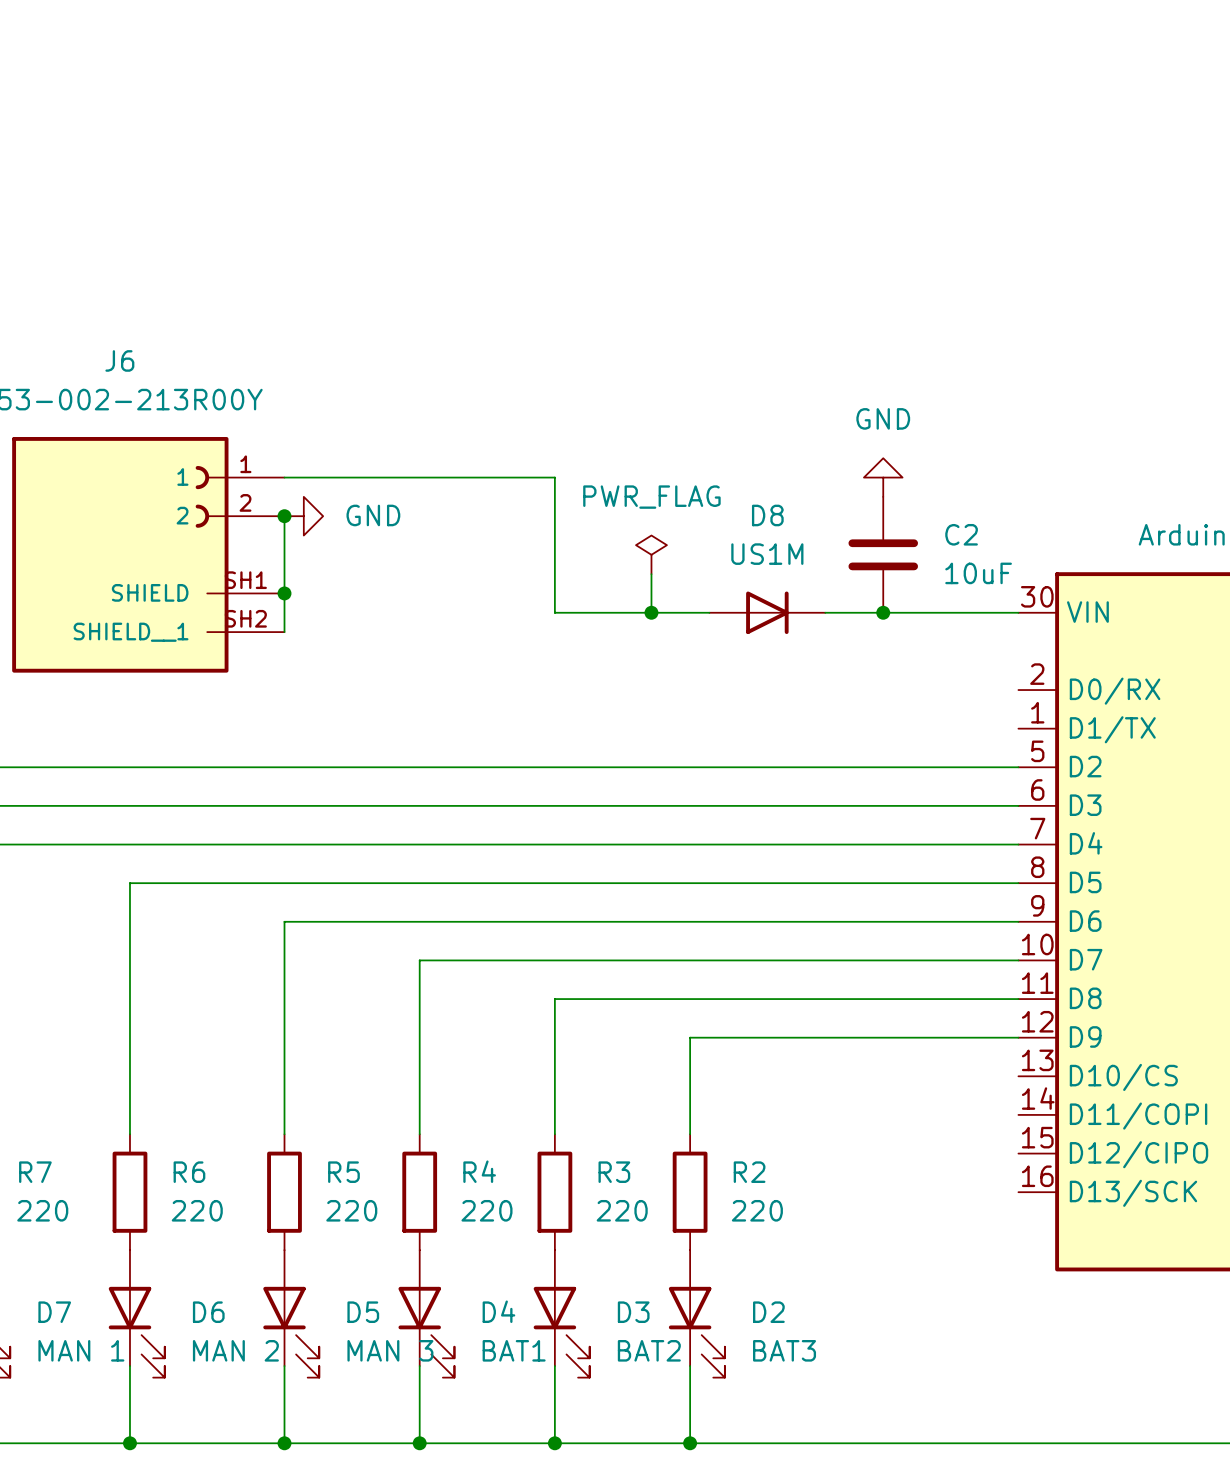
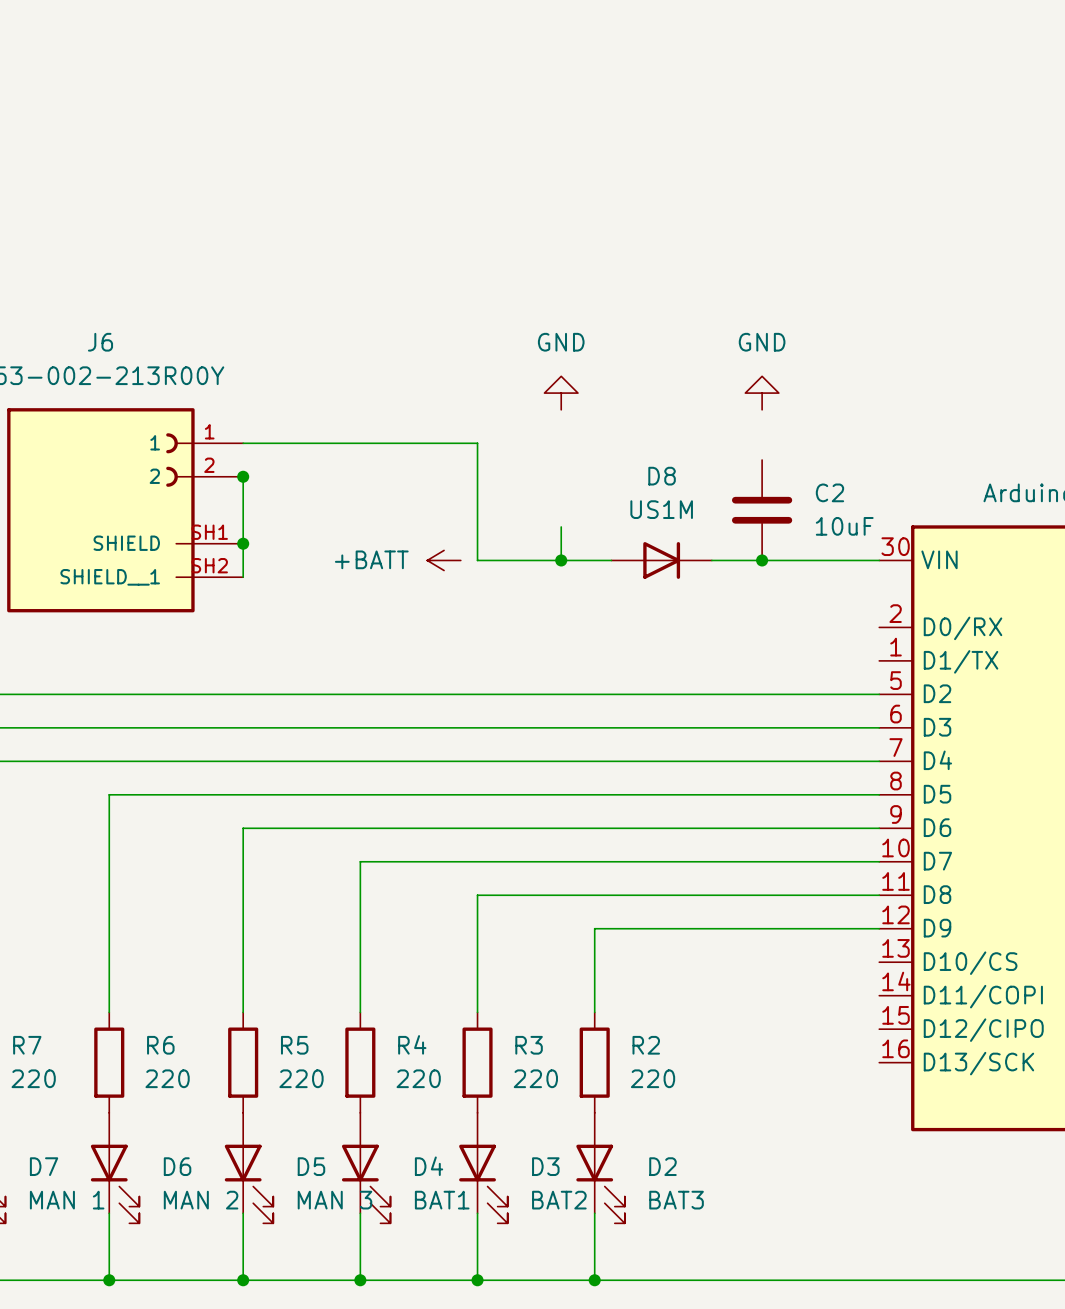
power symbol: none -> GND (561, 393)
power symbol position: GND (883, 477) -> GND (762, 393)
power symbol: GND (303, 516) -> none
power symbol: PWR_FLAG (651, 554) -> none
power symbol: none -> +BATT (444, 560)

